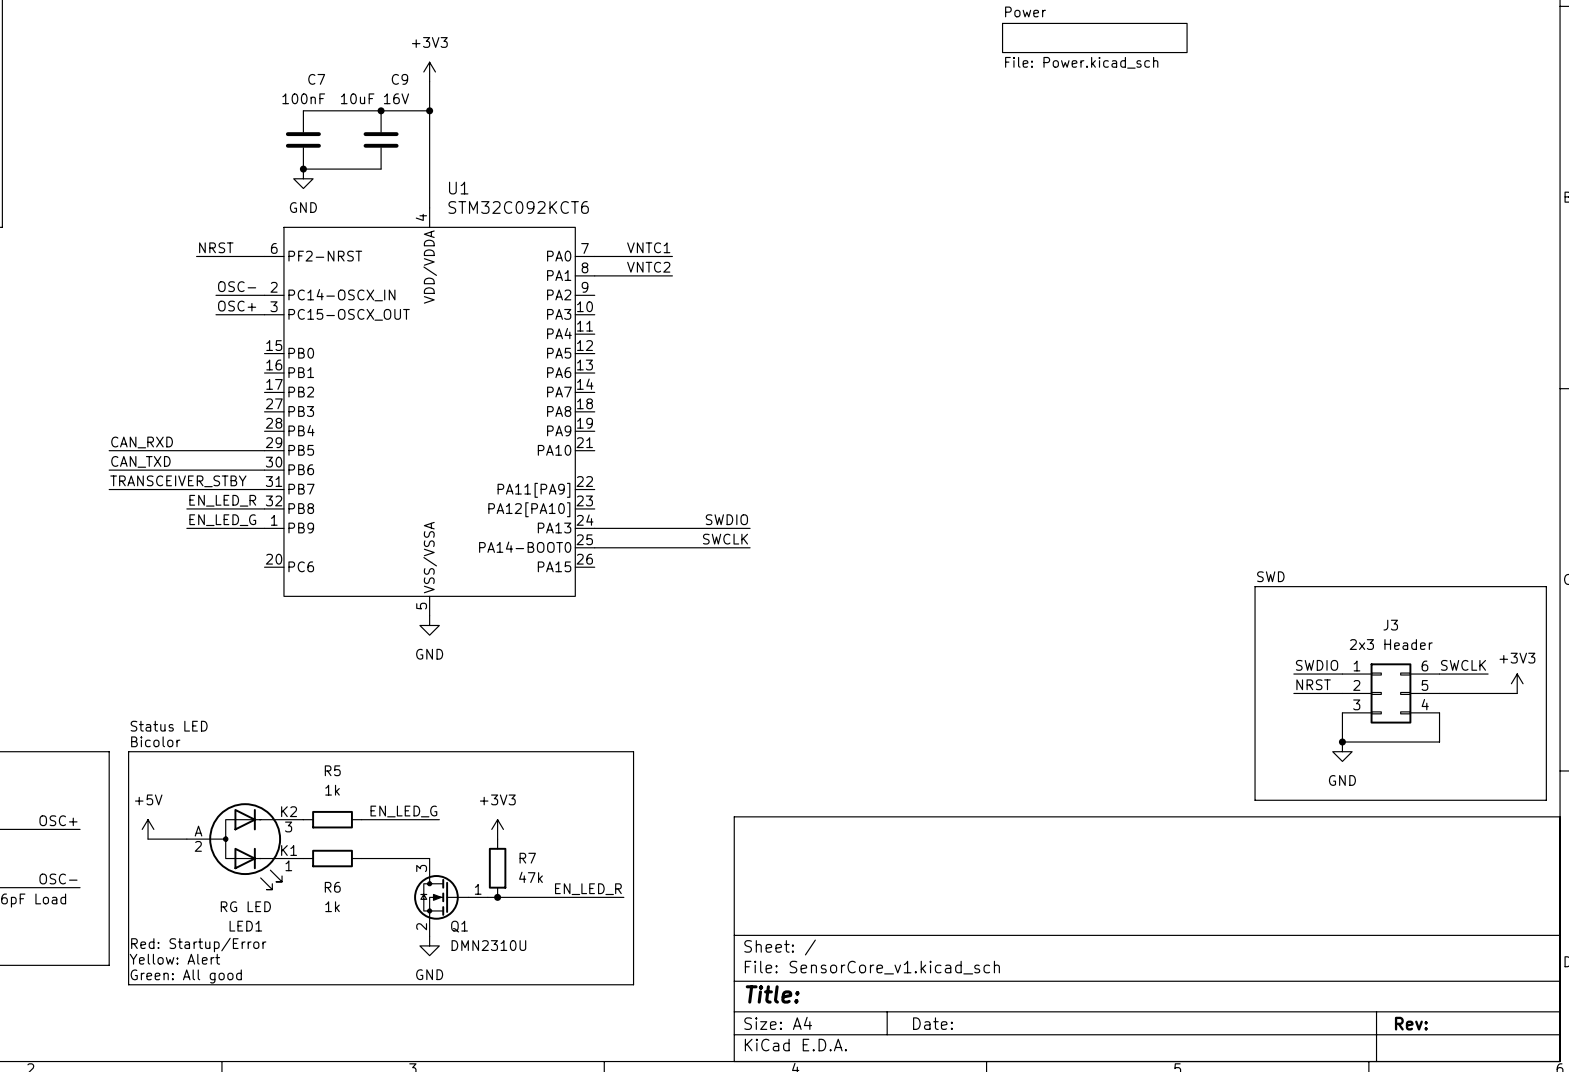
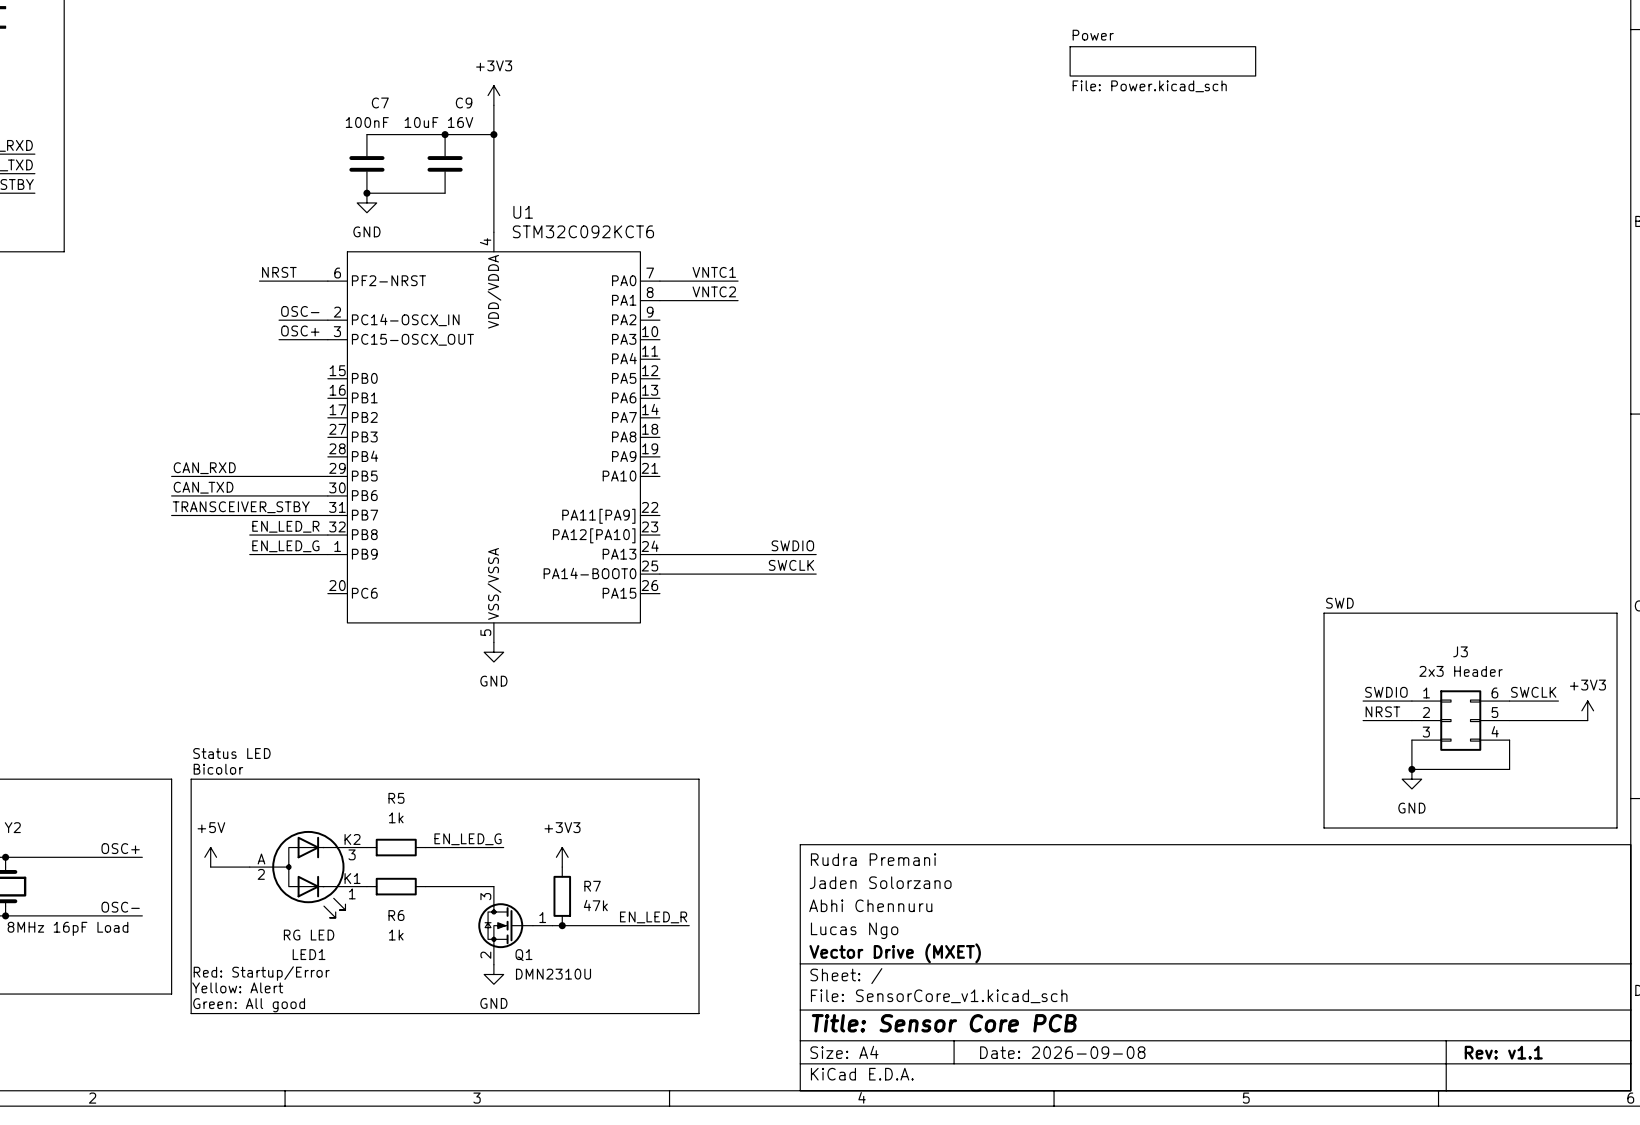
title block: none -> Rudra Premani (873, 859)
title block: none -> Jaden Solorzano (880, 882)
title block: none -> Abhi Chennuru (870, 905)
title block: none -> Lucas Ngo (854, 930)
title block: none -> Vector Drive (MXET) (895, 953)
title block: Title: (772, 994) -> Title: Sensor Core PCB (944, 1023)
title block: Date: (933, 1023) -> Date: 2026-09-08 (1062, 1052)
title block: Rev: (1411, 1023) -> Rev: v1.1 (1503, 1052)

